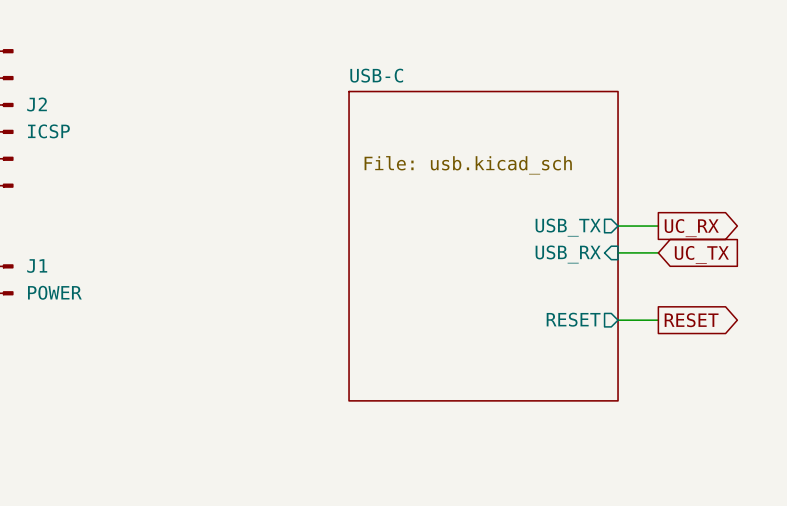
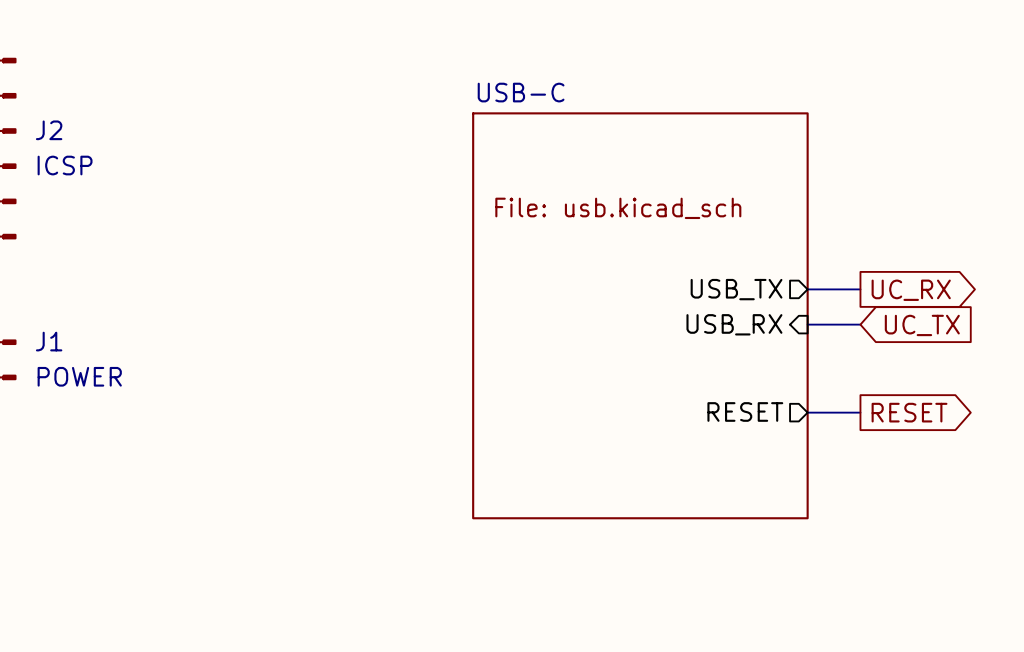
sheet USB-C shape: [348, 90, 619, 402] -> [472, 112, 809, 520]

